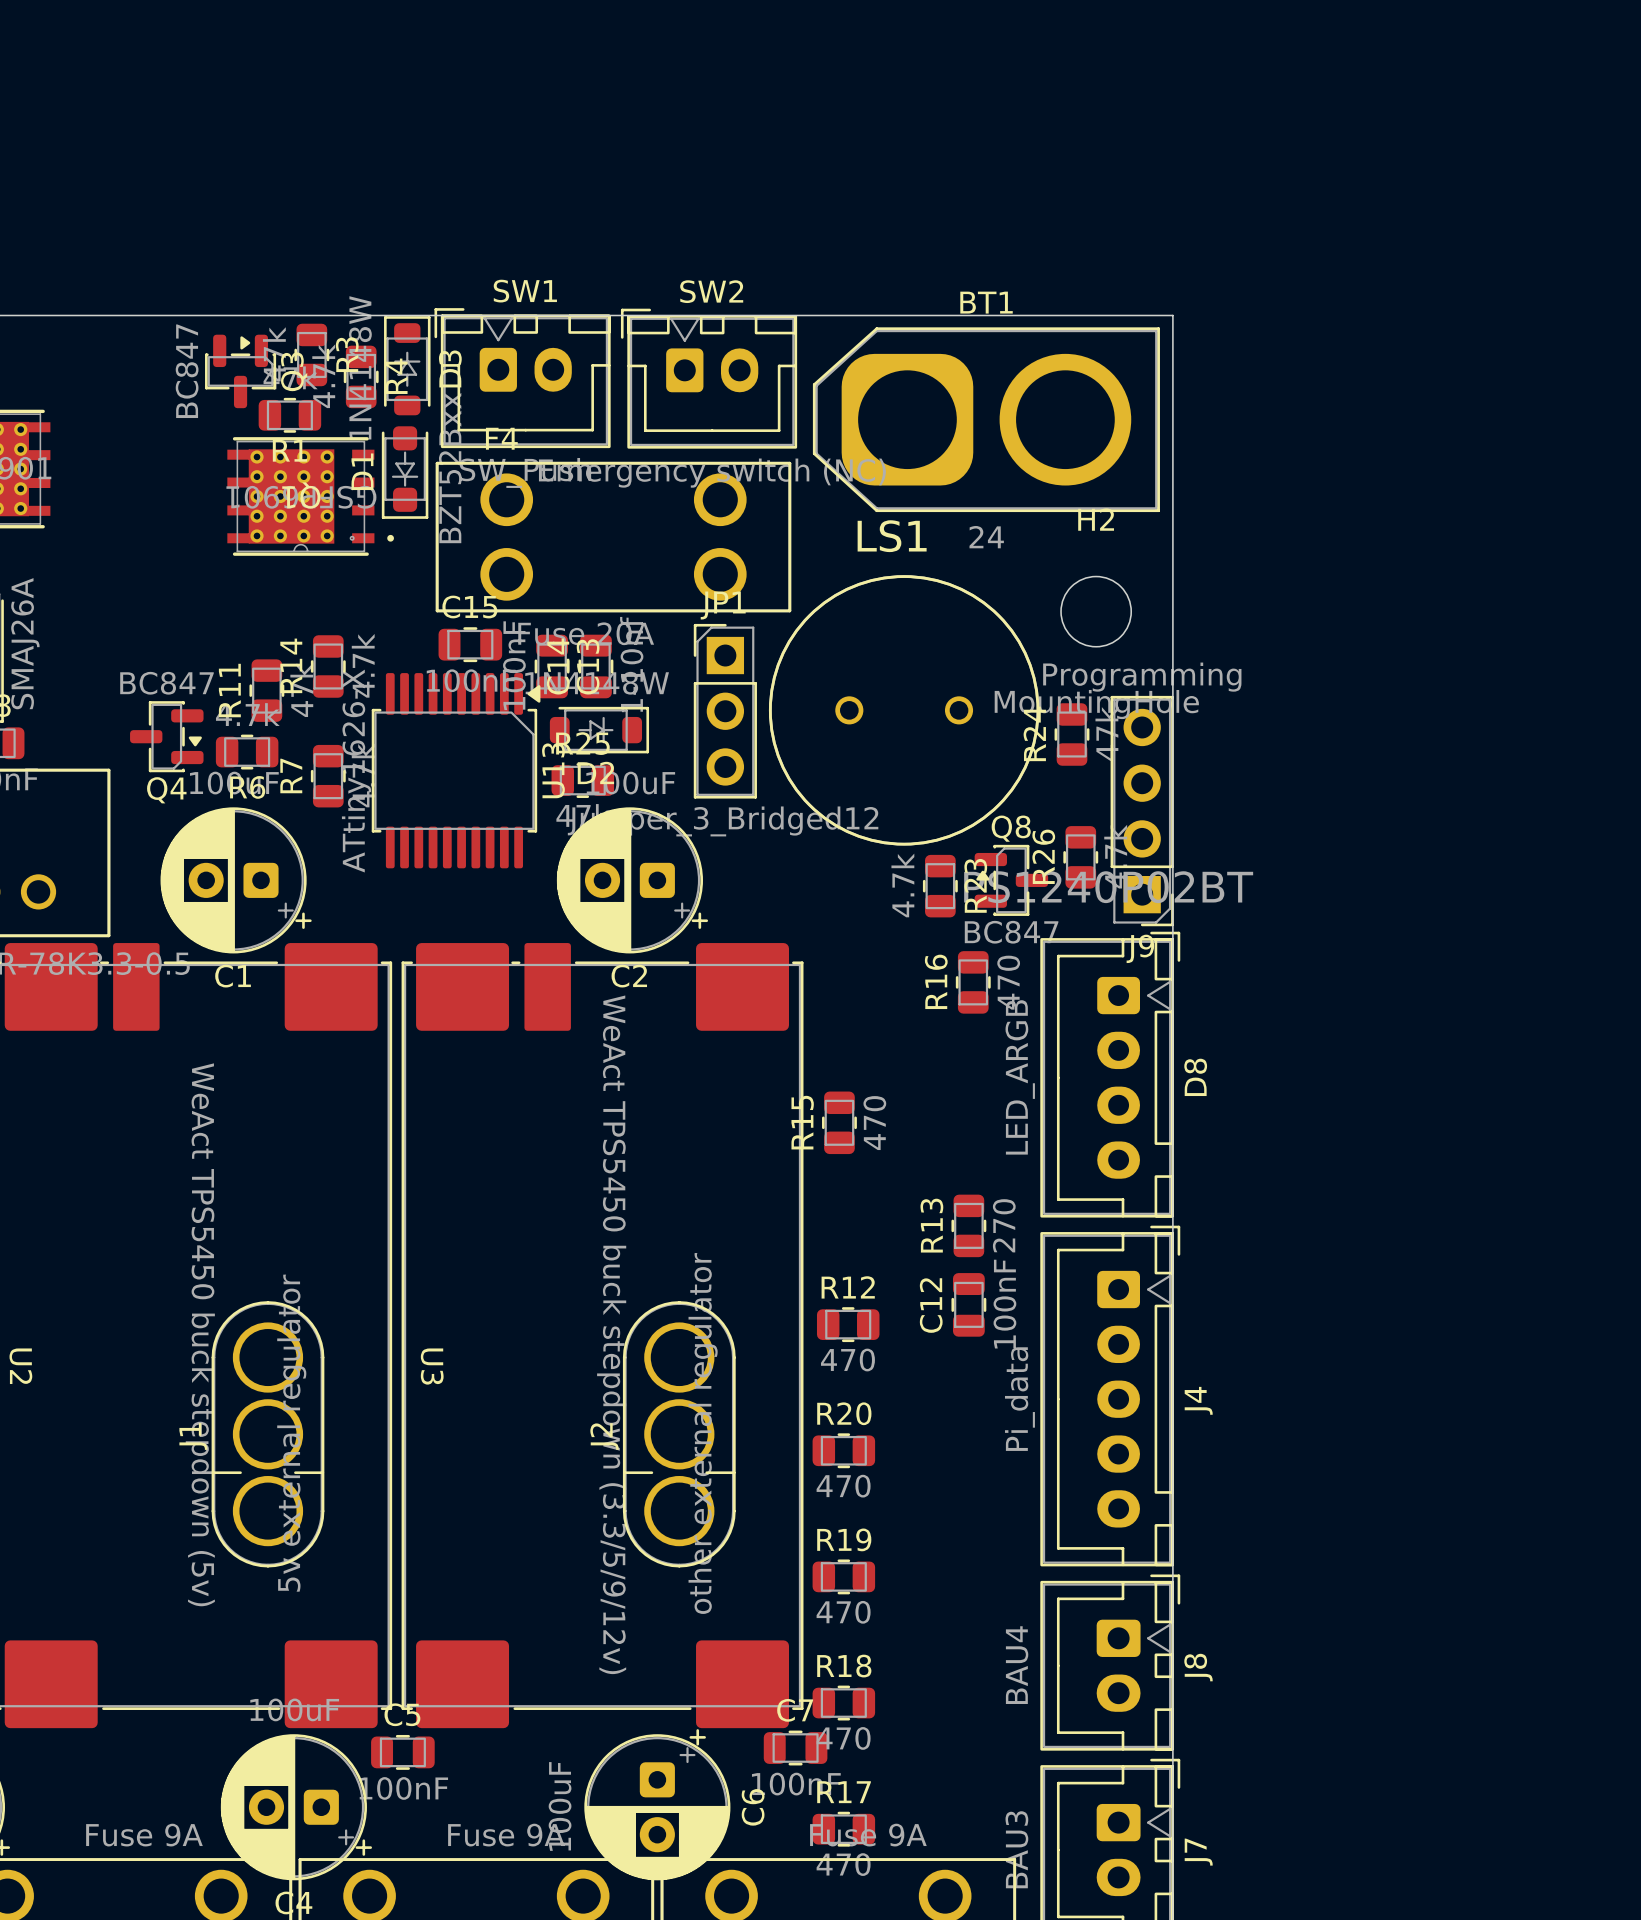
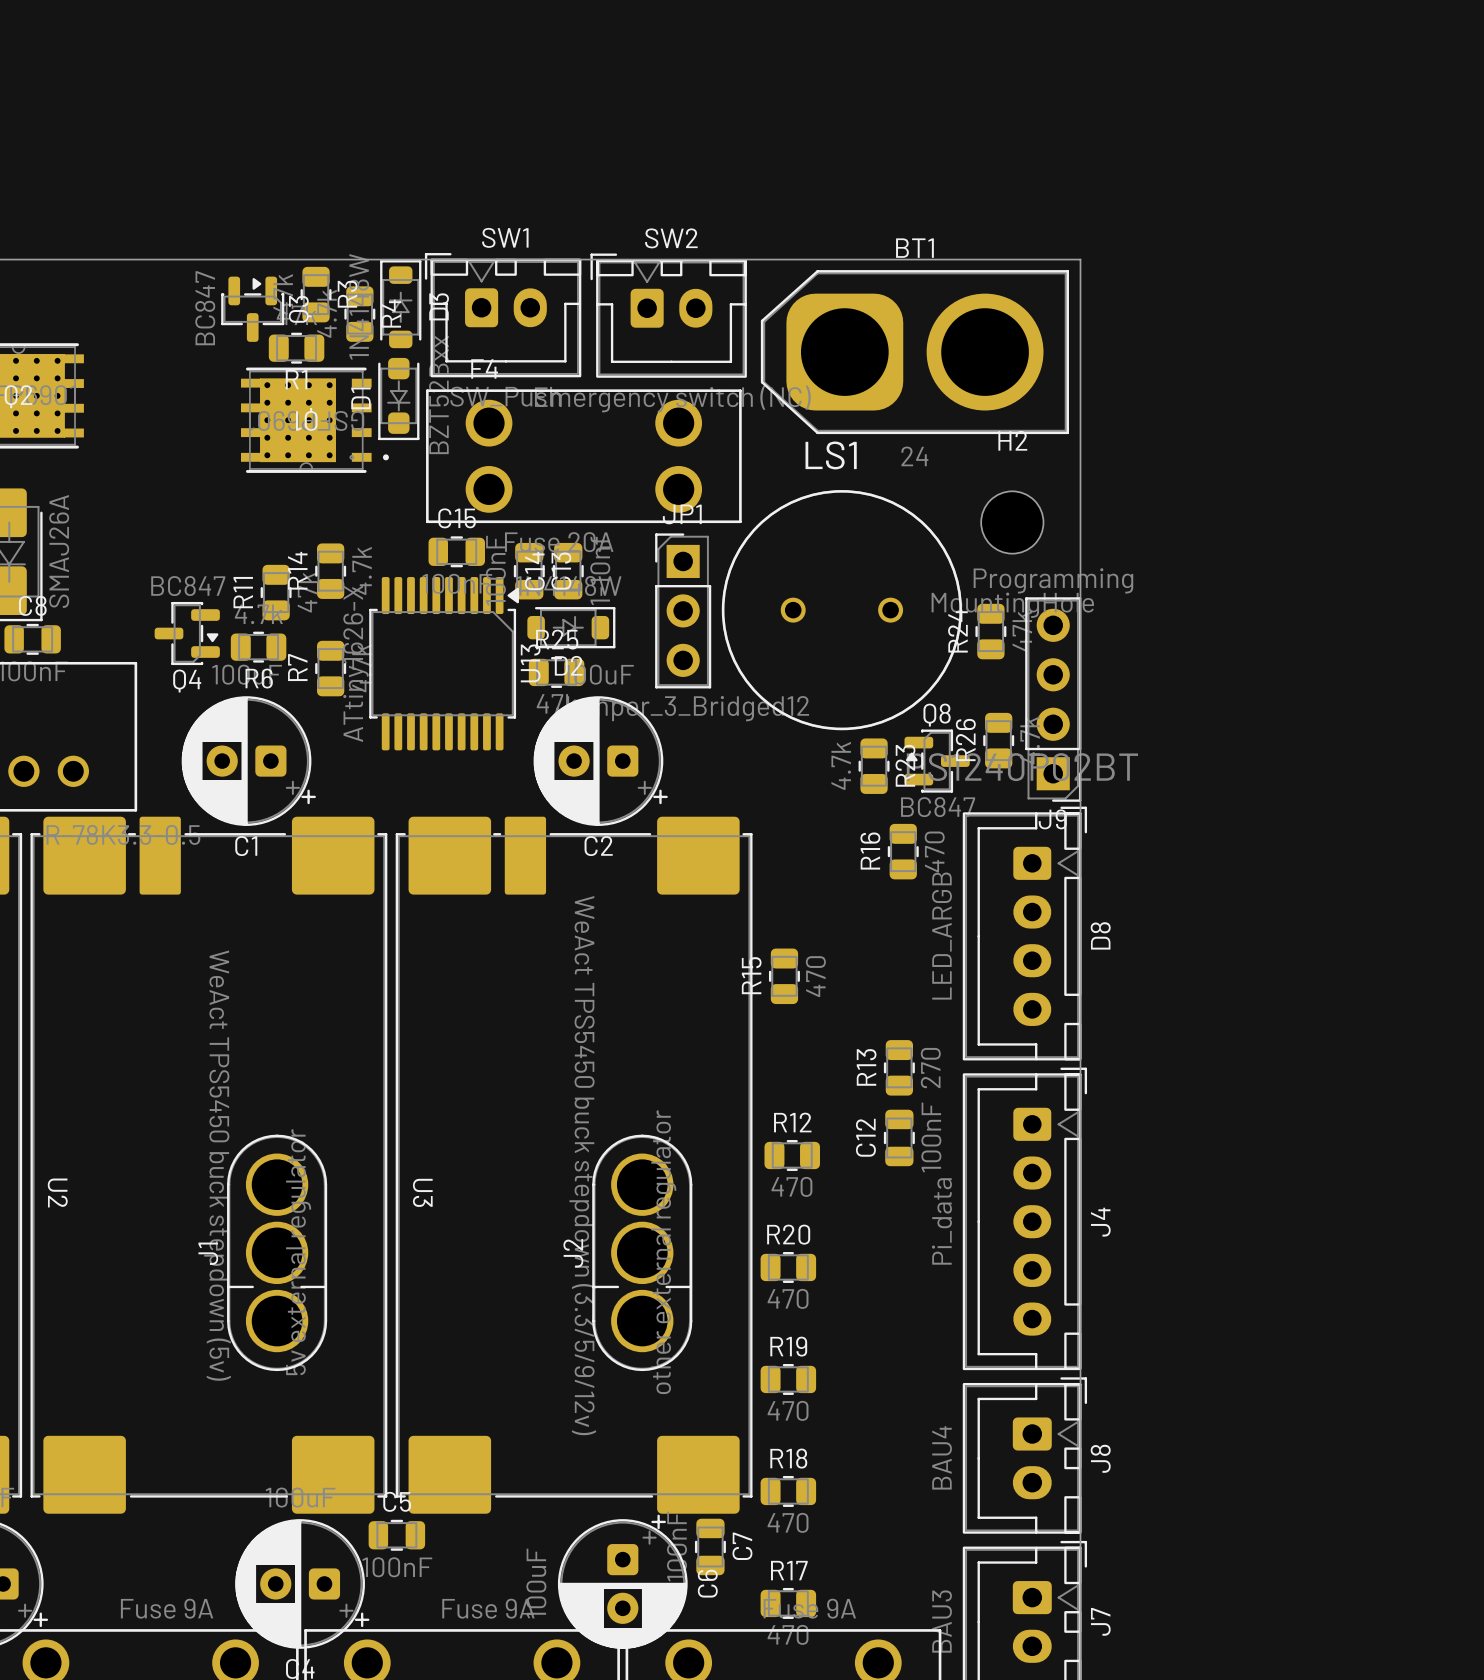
C7 rotation: 0° (795, 1748) -> 90° clockwise (710, 1546)
C7 position: (795, 1748) -> (710, 1546)

